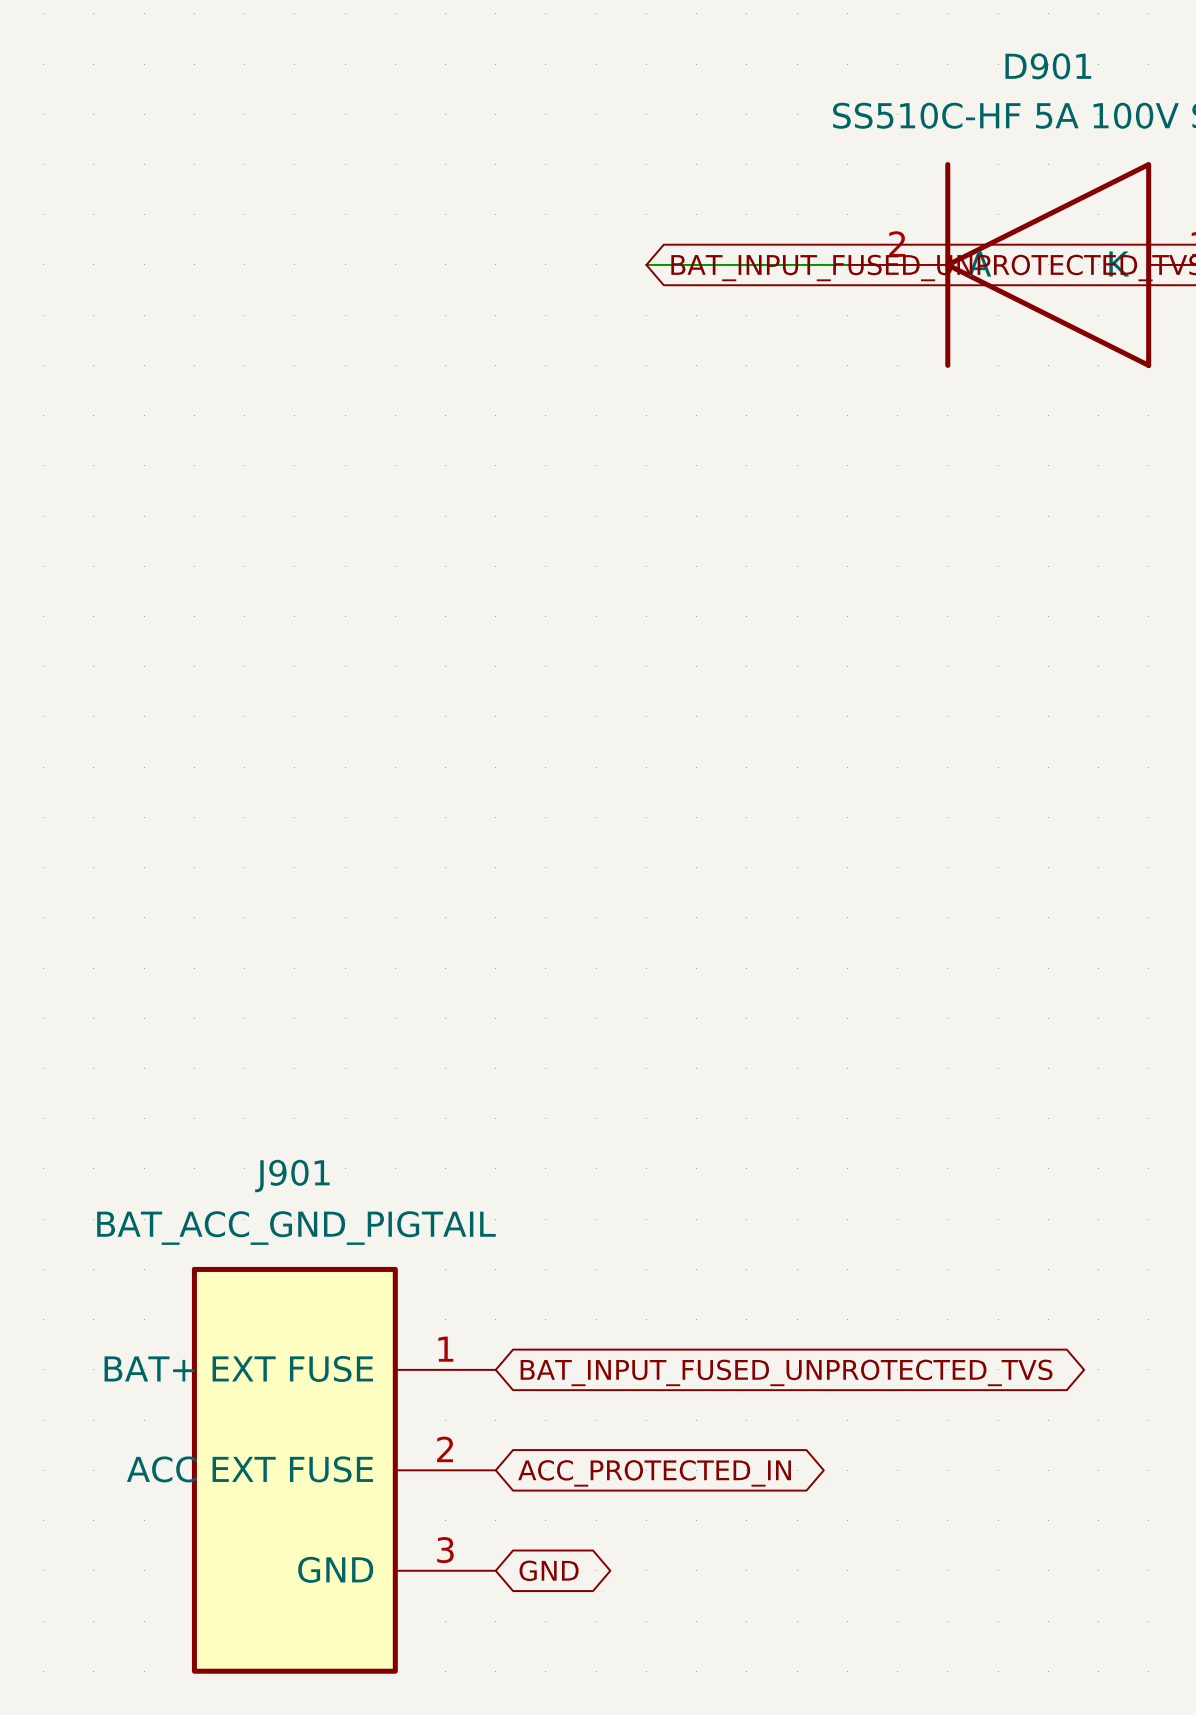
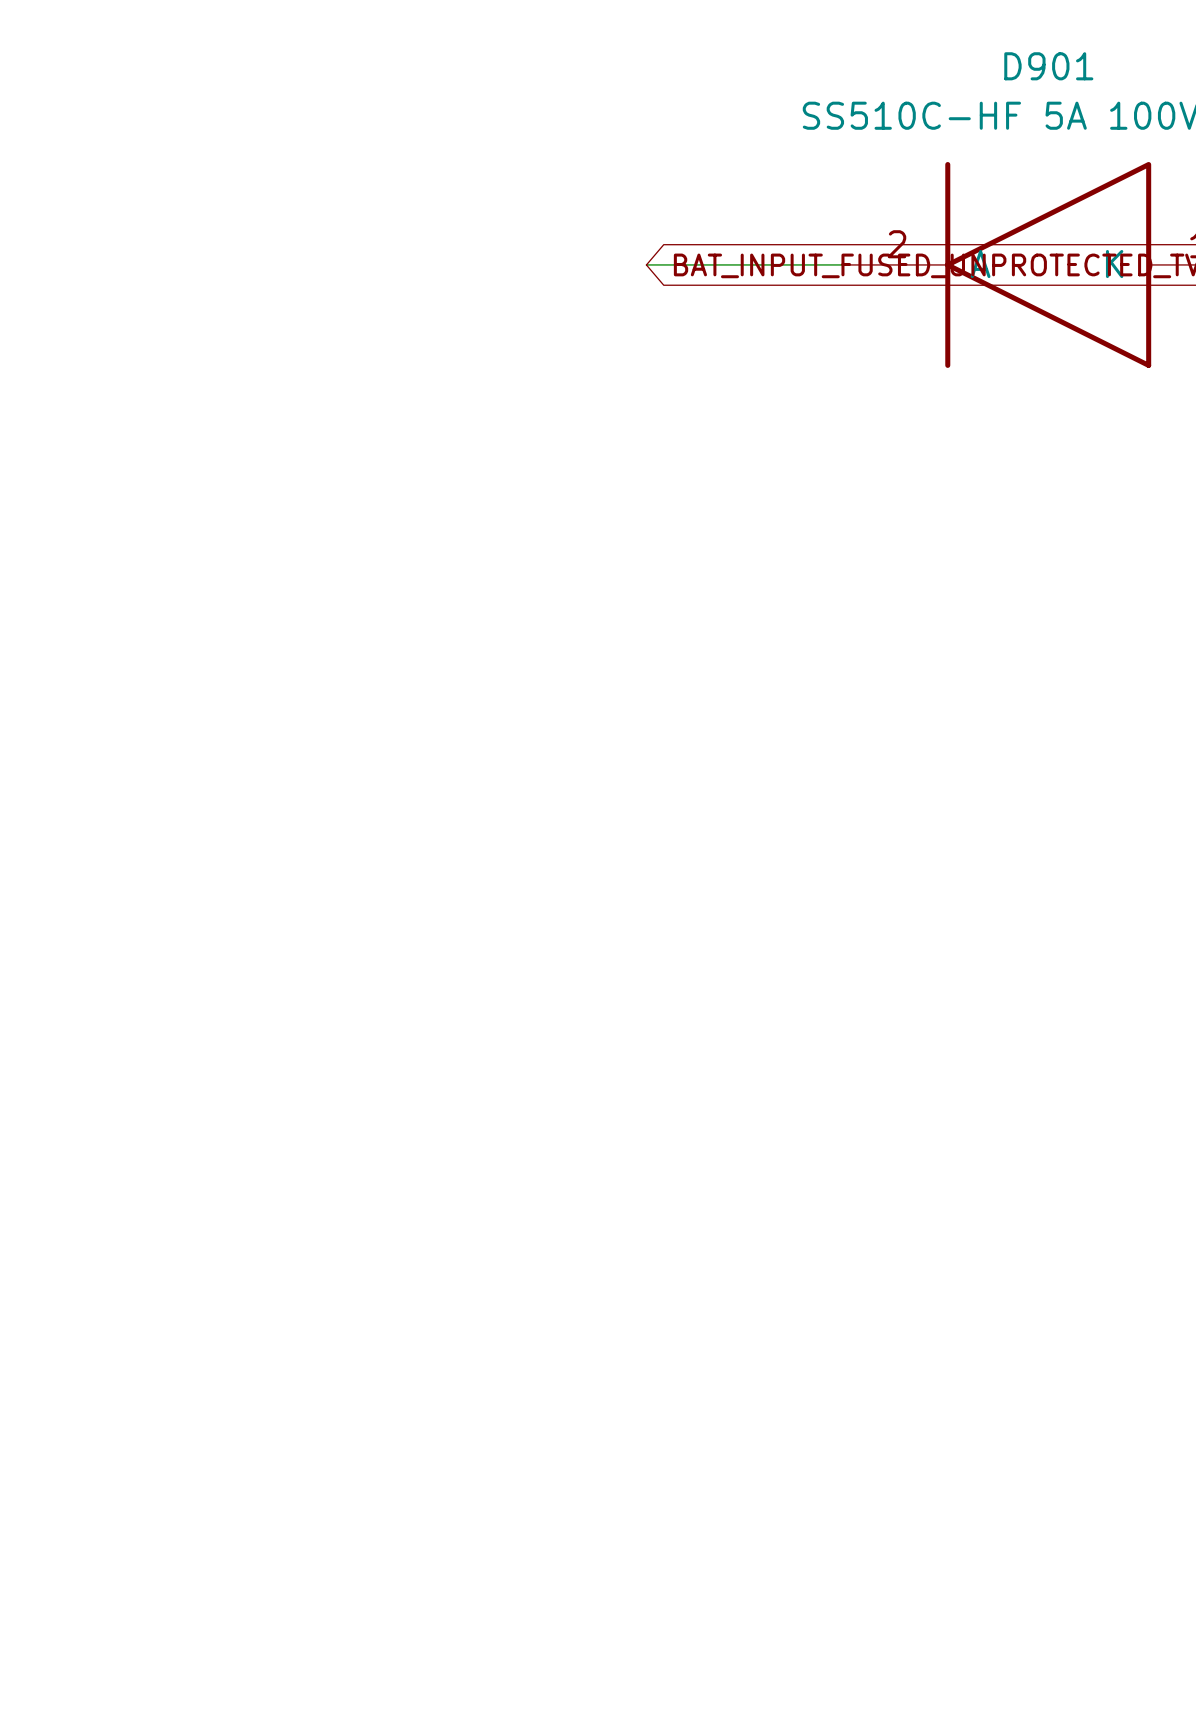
global label: BAT_INPUT_FUSED_UNPROTECTED_TVS (786, 1372) -> none
J901: BAT_ACC_GND_PIGTAIL (343, 1470) -> none
global label: ACC_PROTECTED_IN (654, 1473) -> none
global label: GND (549, 1570) -> none

